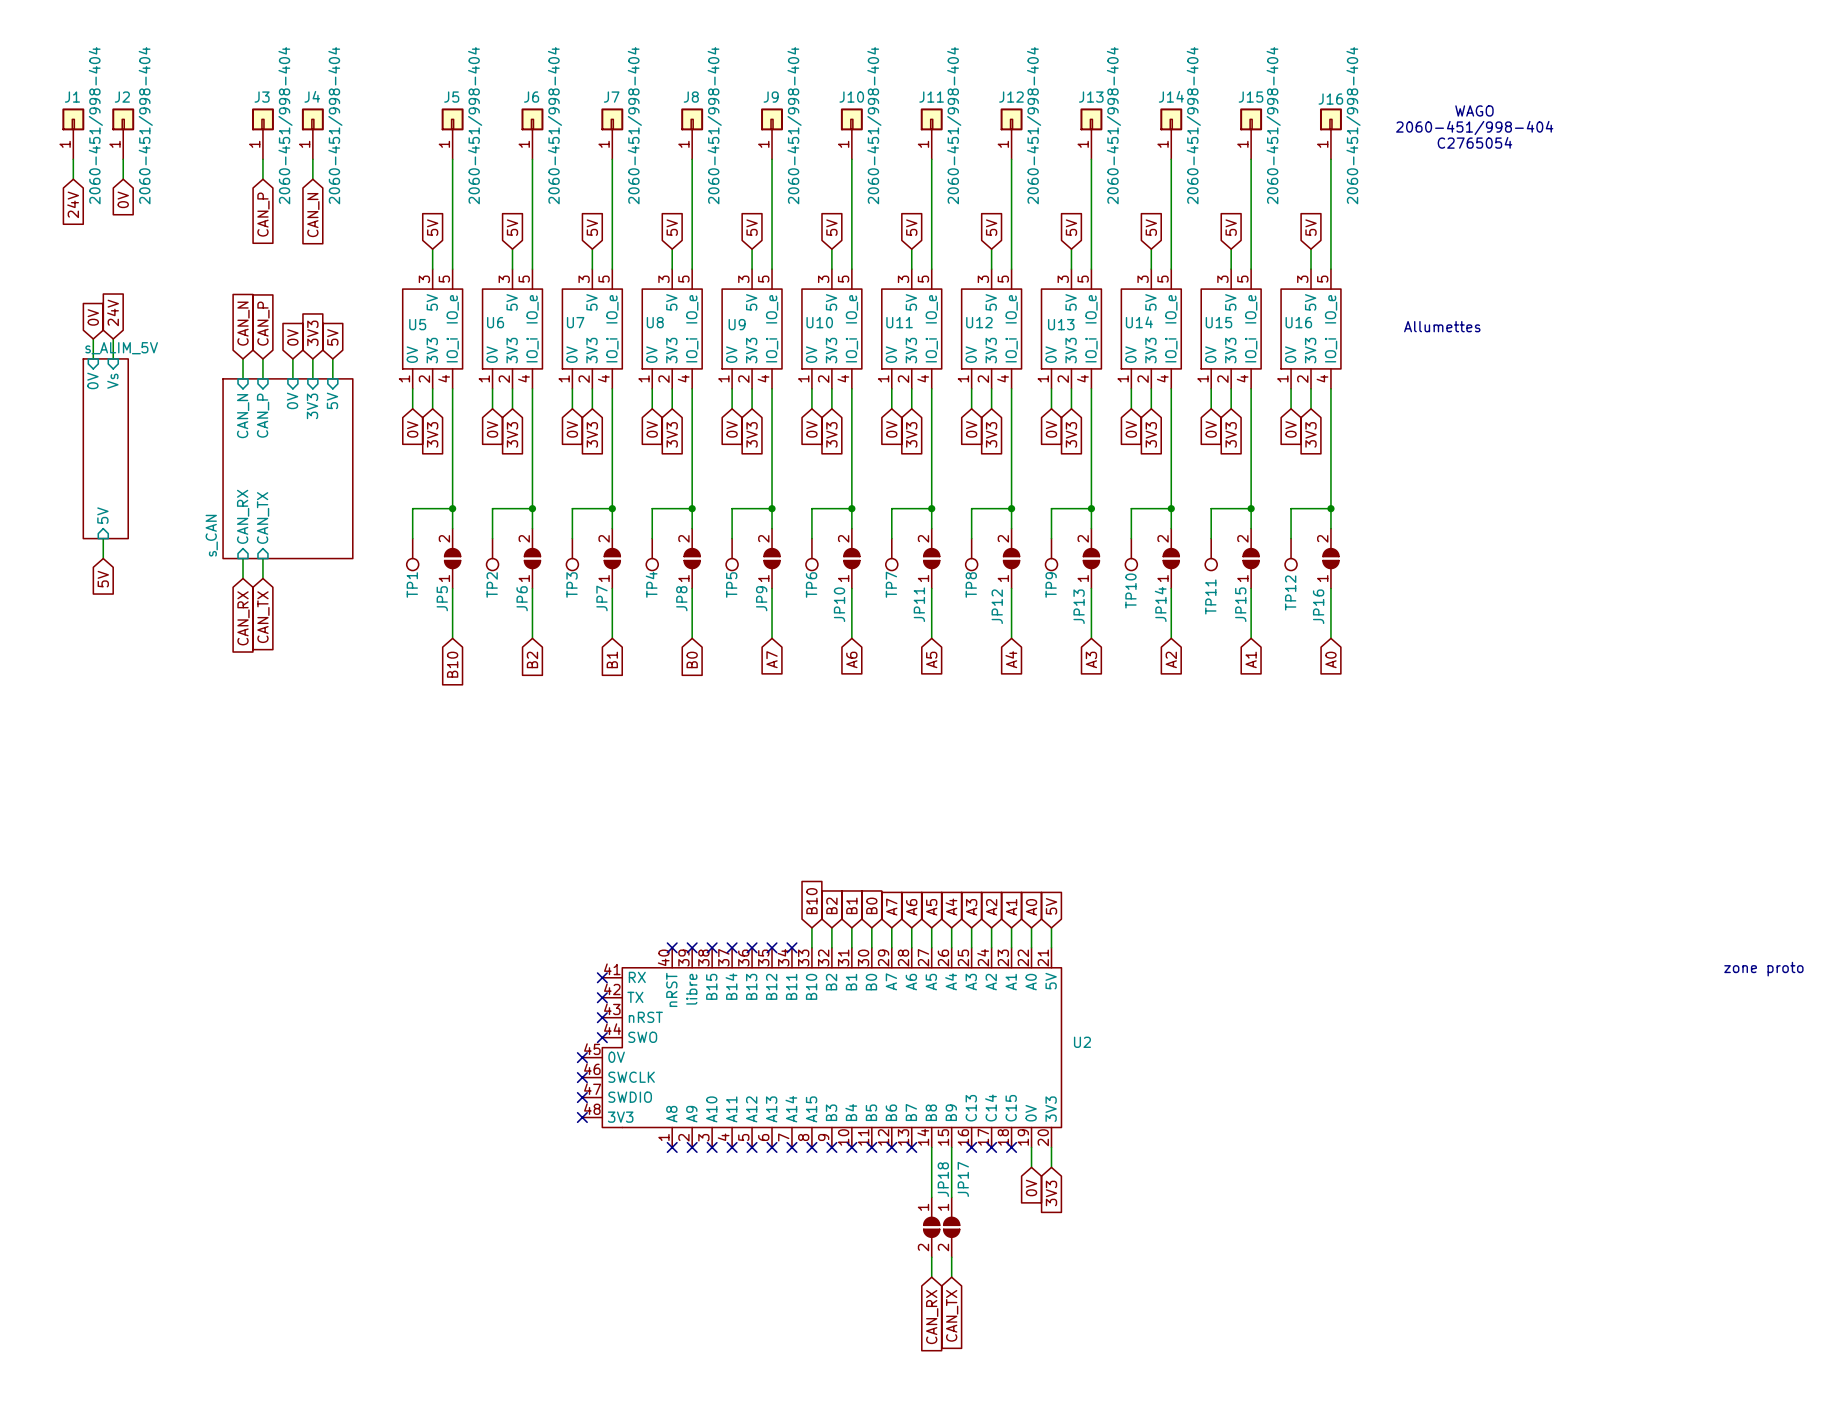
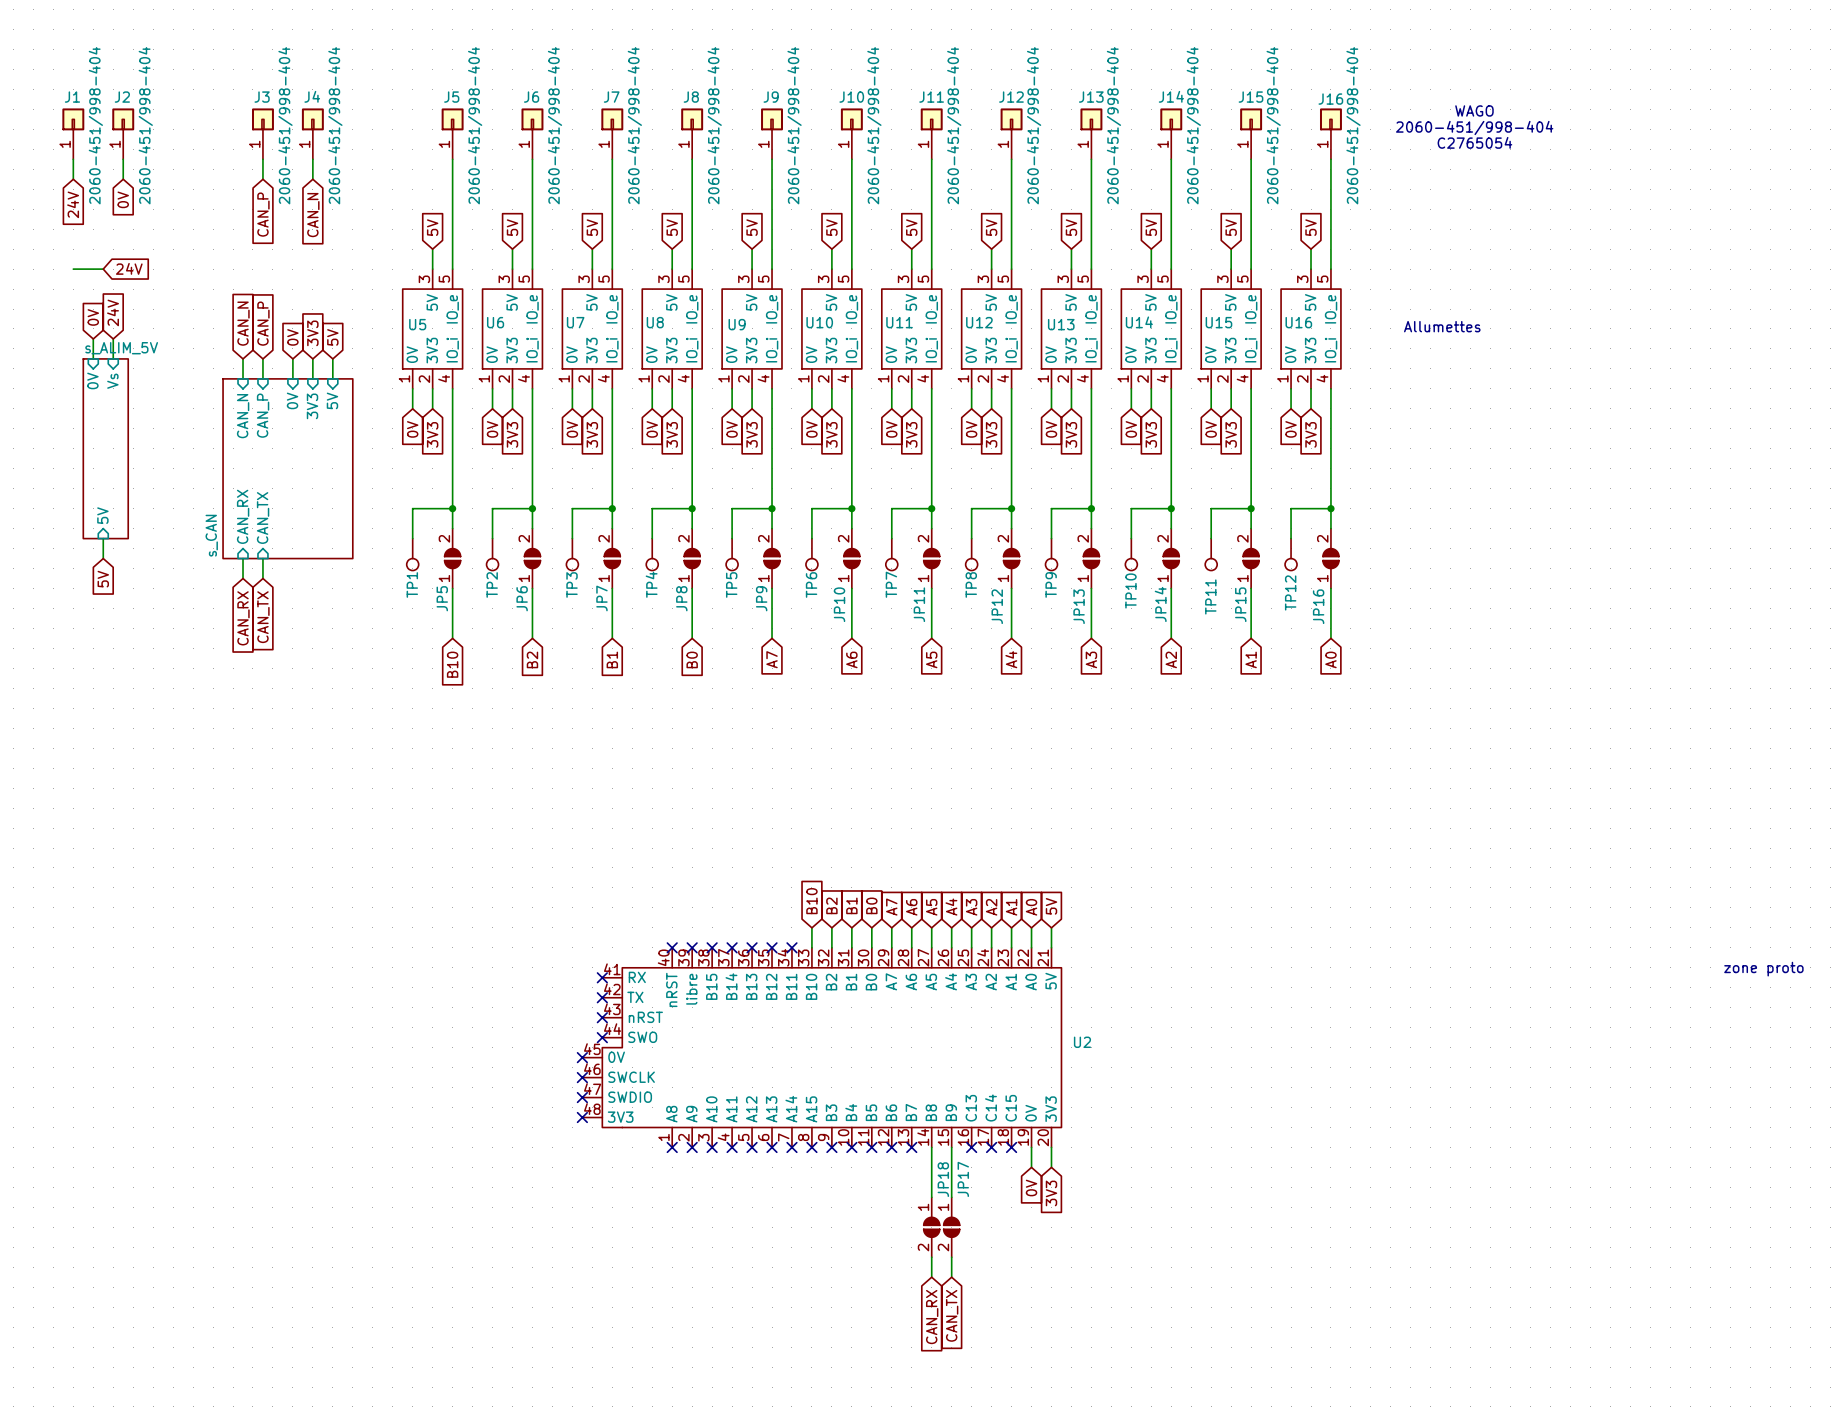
global label: none -> 24V (129, 268)
wire: none -> (73, 269) (103, 269)

